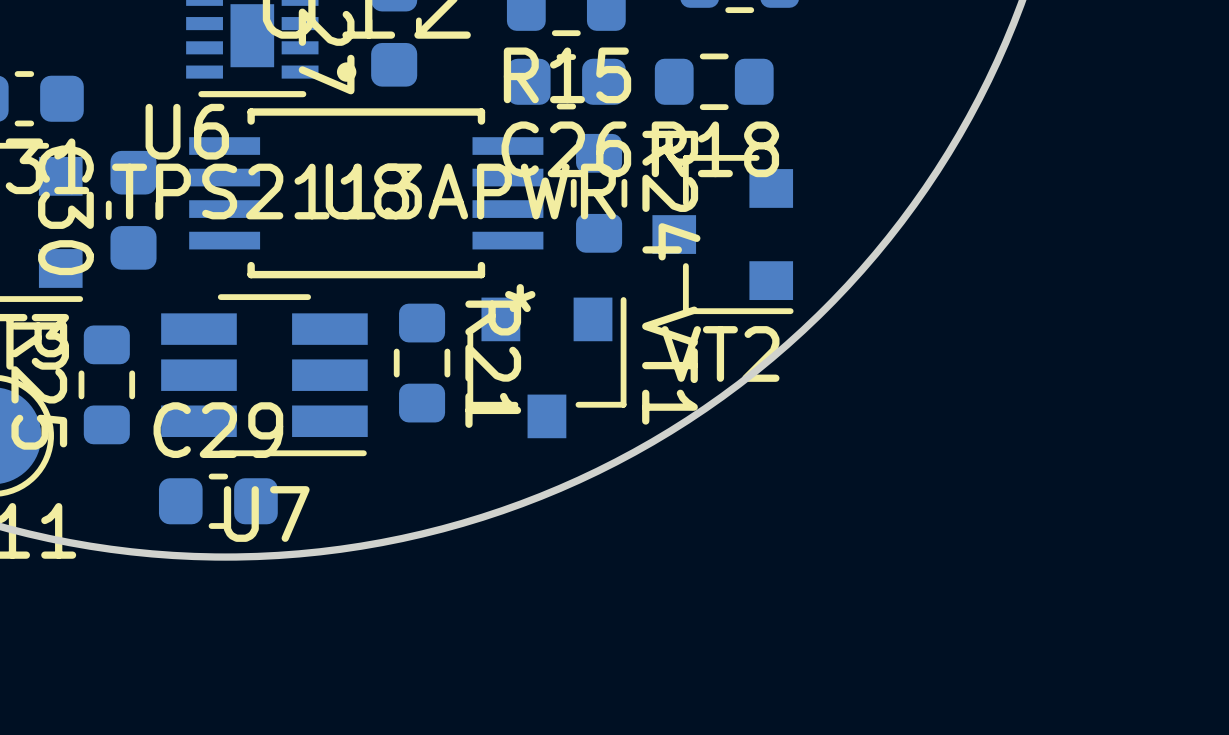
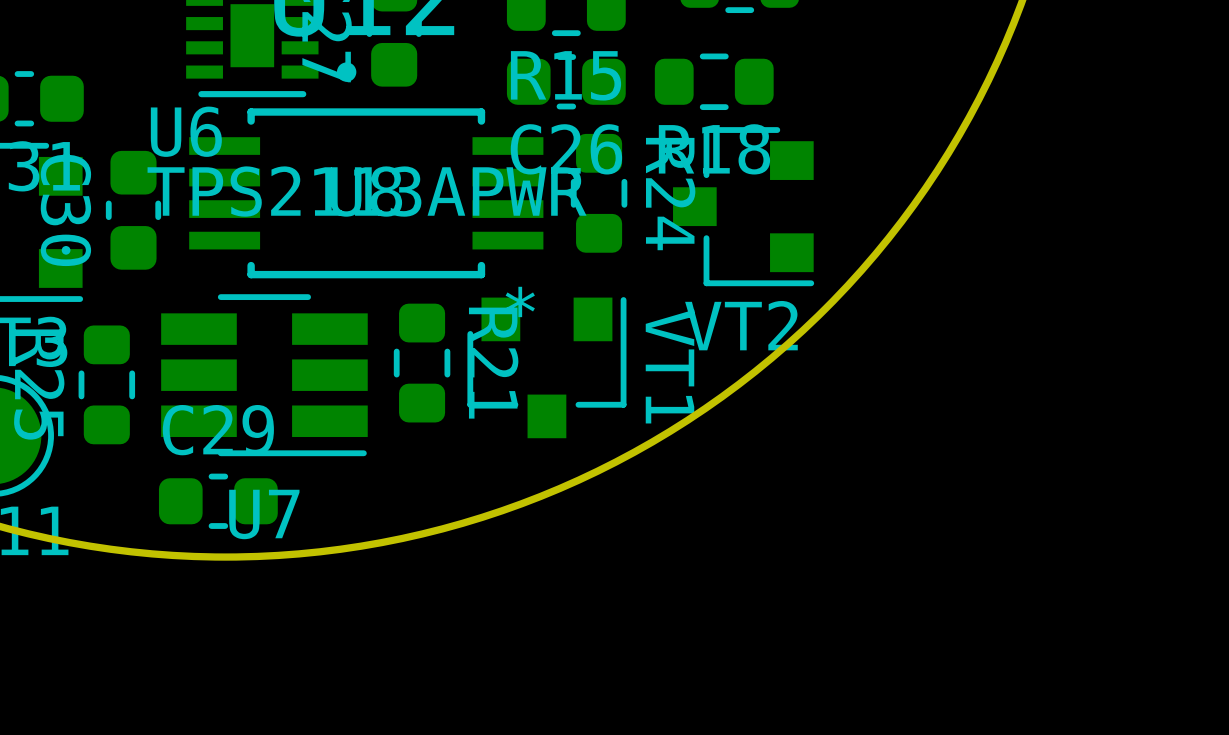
VT2 position: (722, 234) -> (743, 206)

